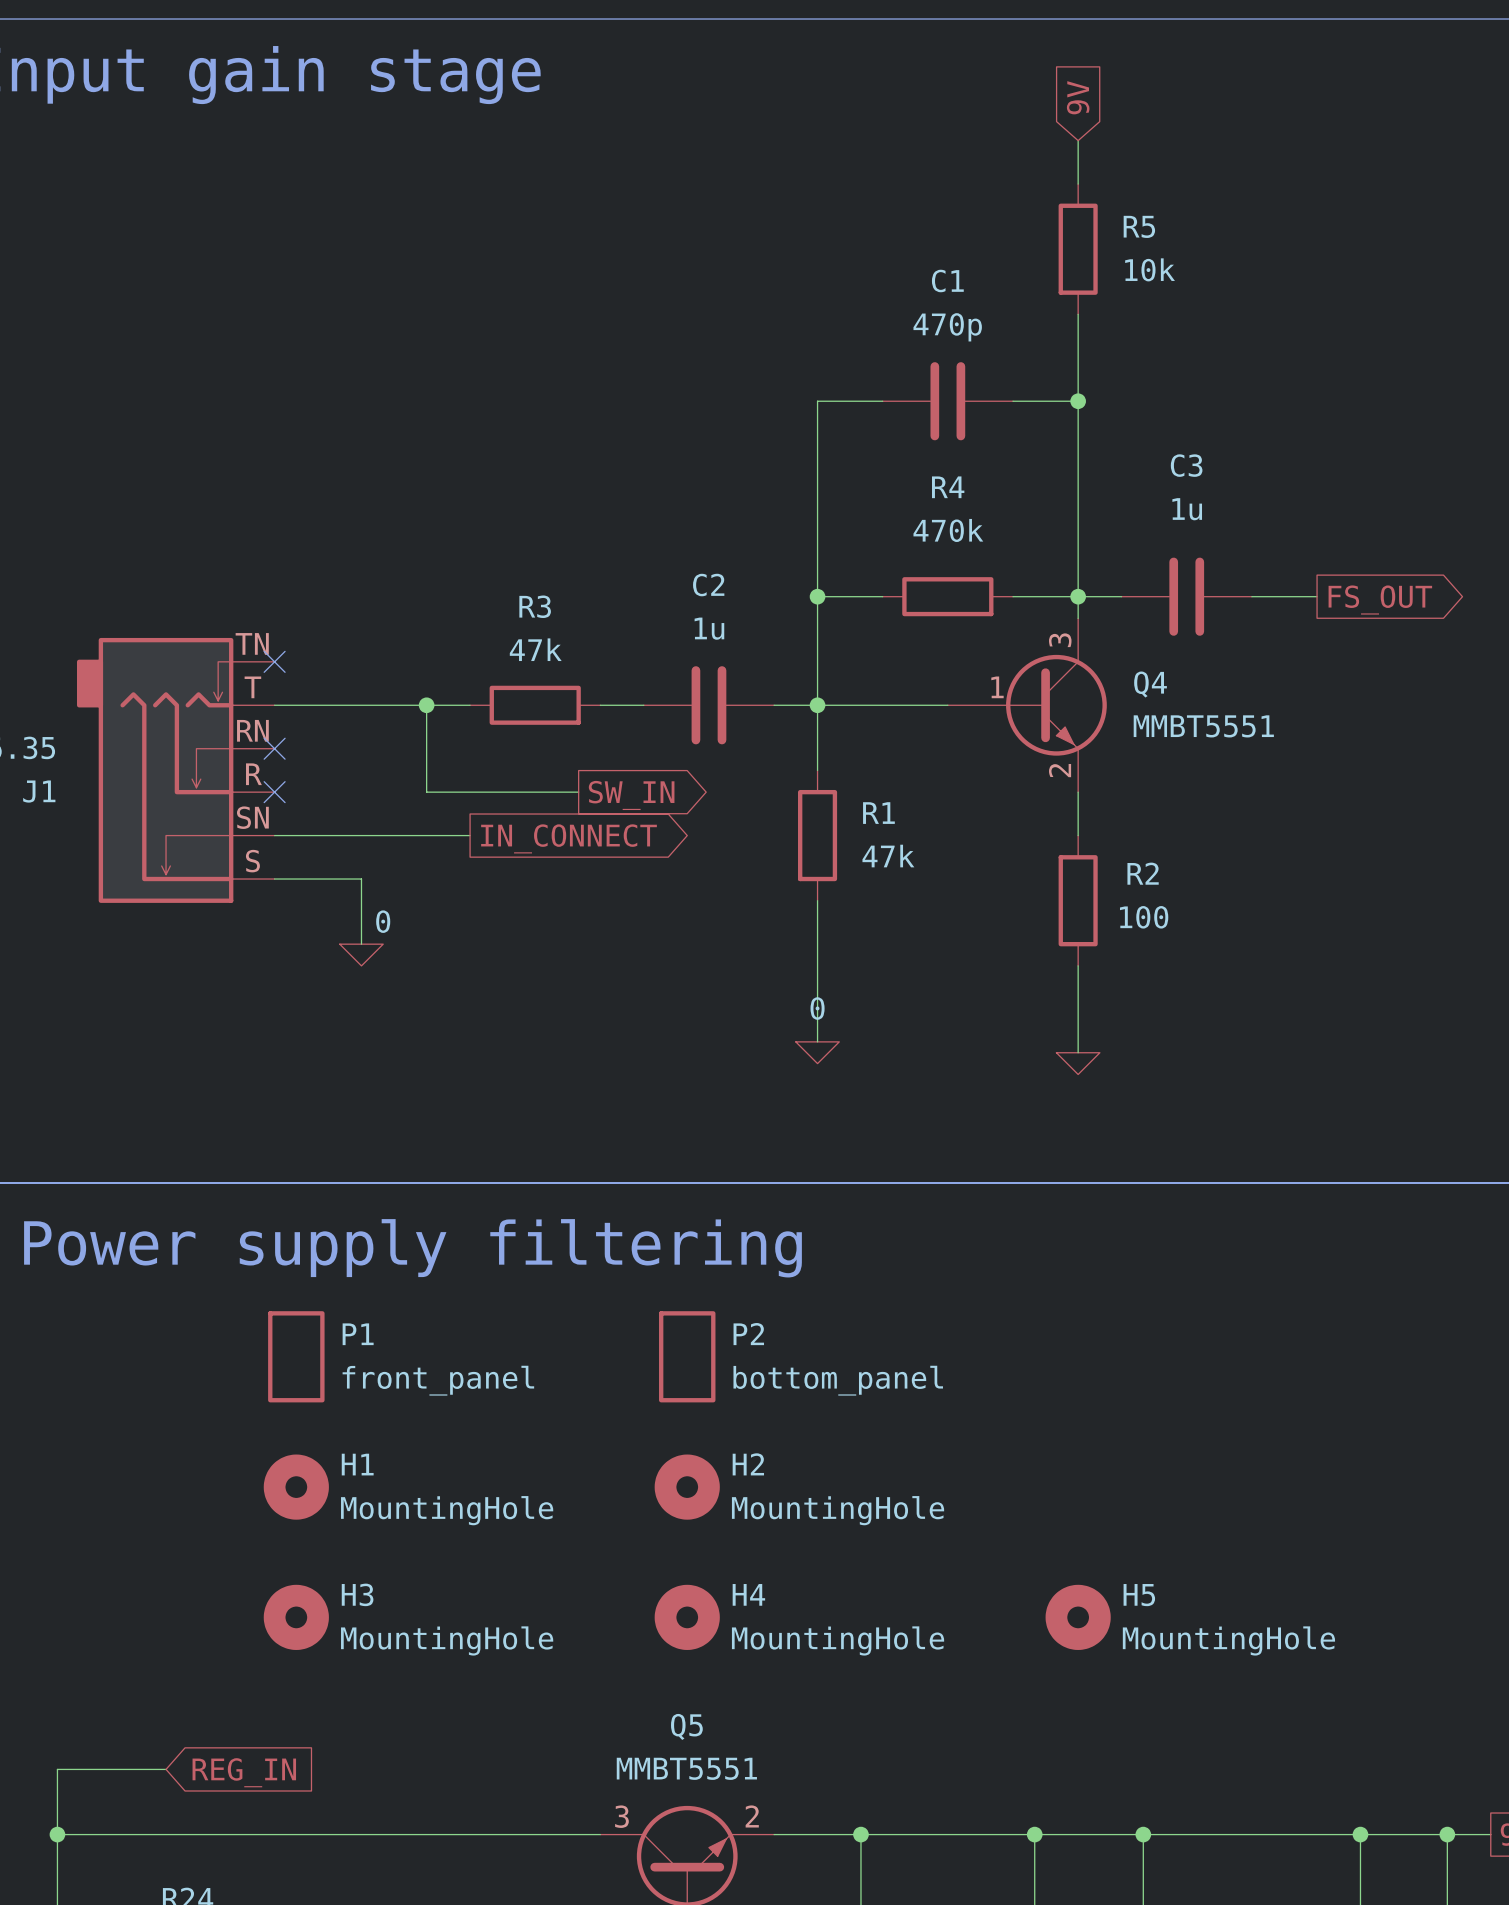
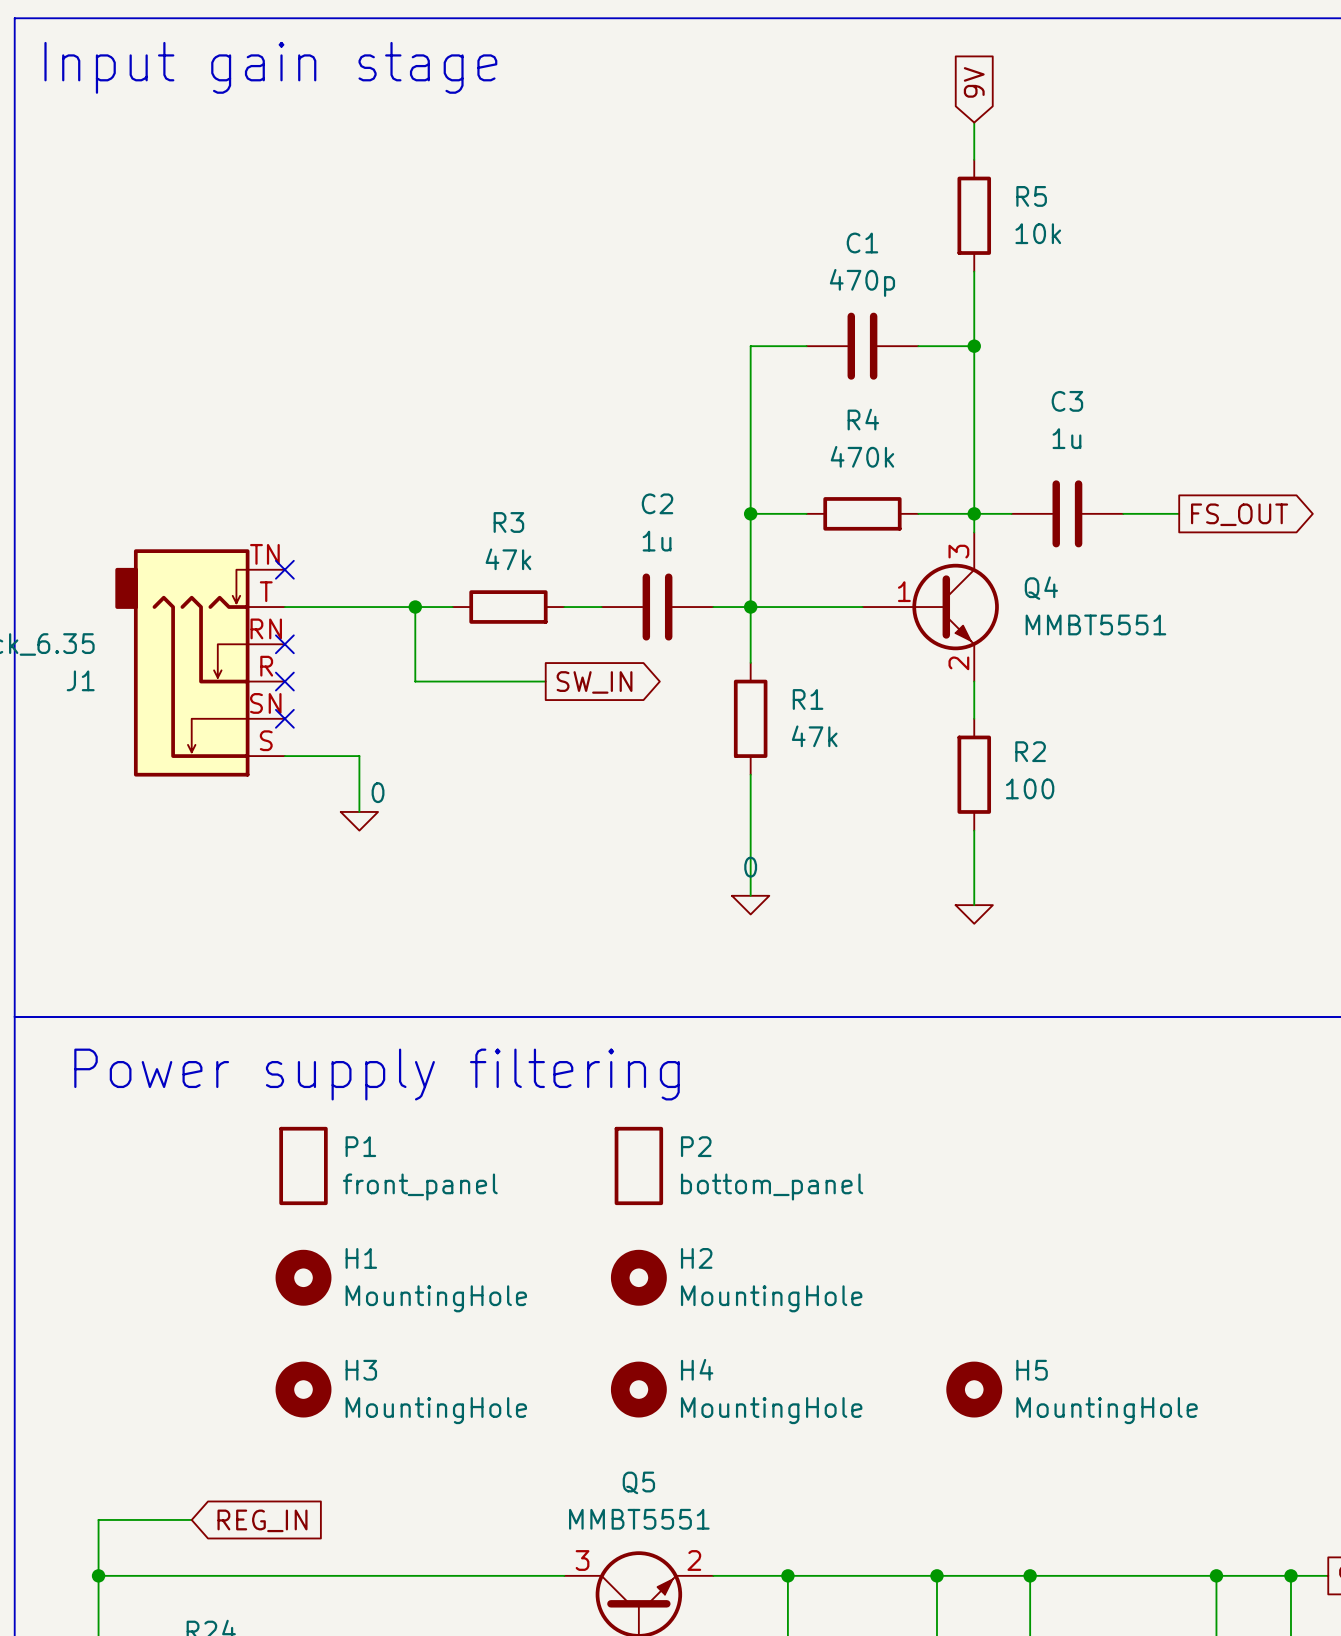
wire: (274, 835) (470, 835) -> none
no-connect mark: none -> (284, 718)
global label: IN_CONNECT (569, 838) -> none

